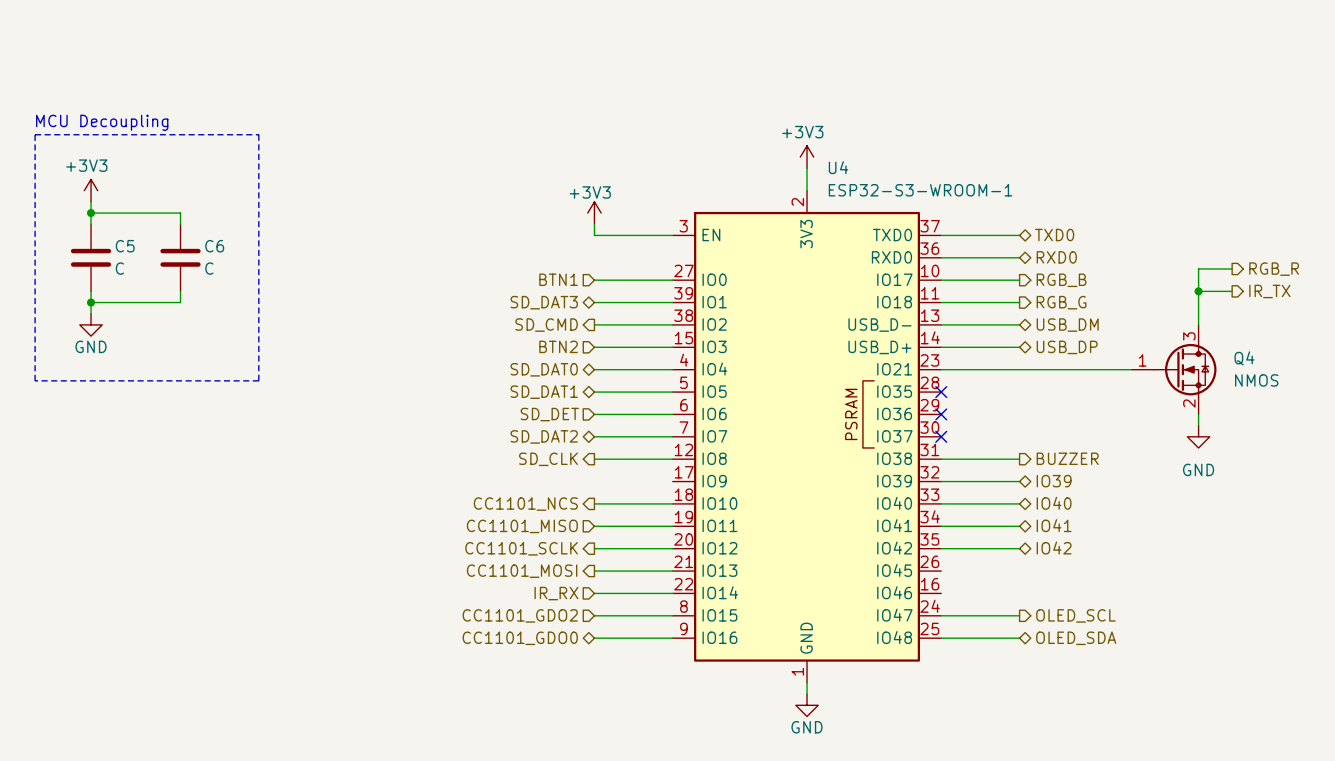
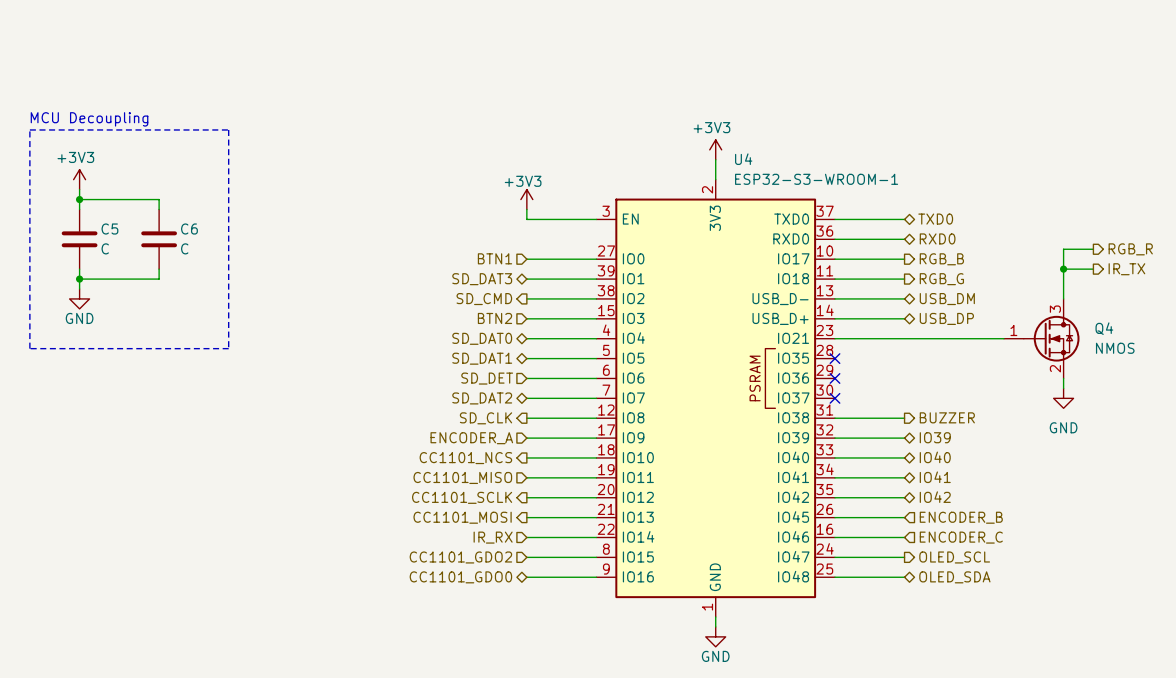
hierarchical label: none -> ENCODER_A (471, 438)
wire: none -> (526, 438) (596, 438)
wire: none -> (834, 517) (904, 517)
hierarchical label: none -> ENCODER_B (961, 517)
wire: none -> (834, 537) (904, 537)
hierarchical label: none -> ENCODER_C (961, 537)

